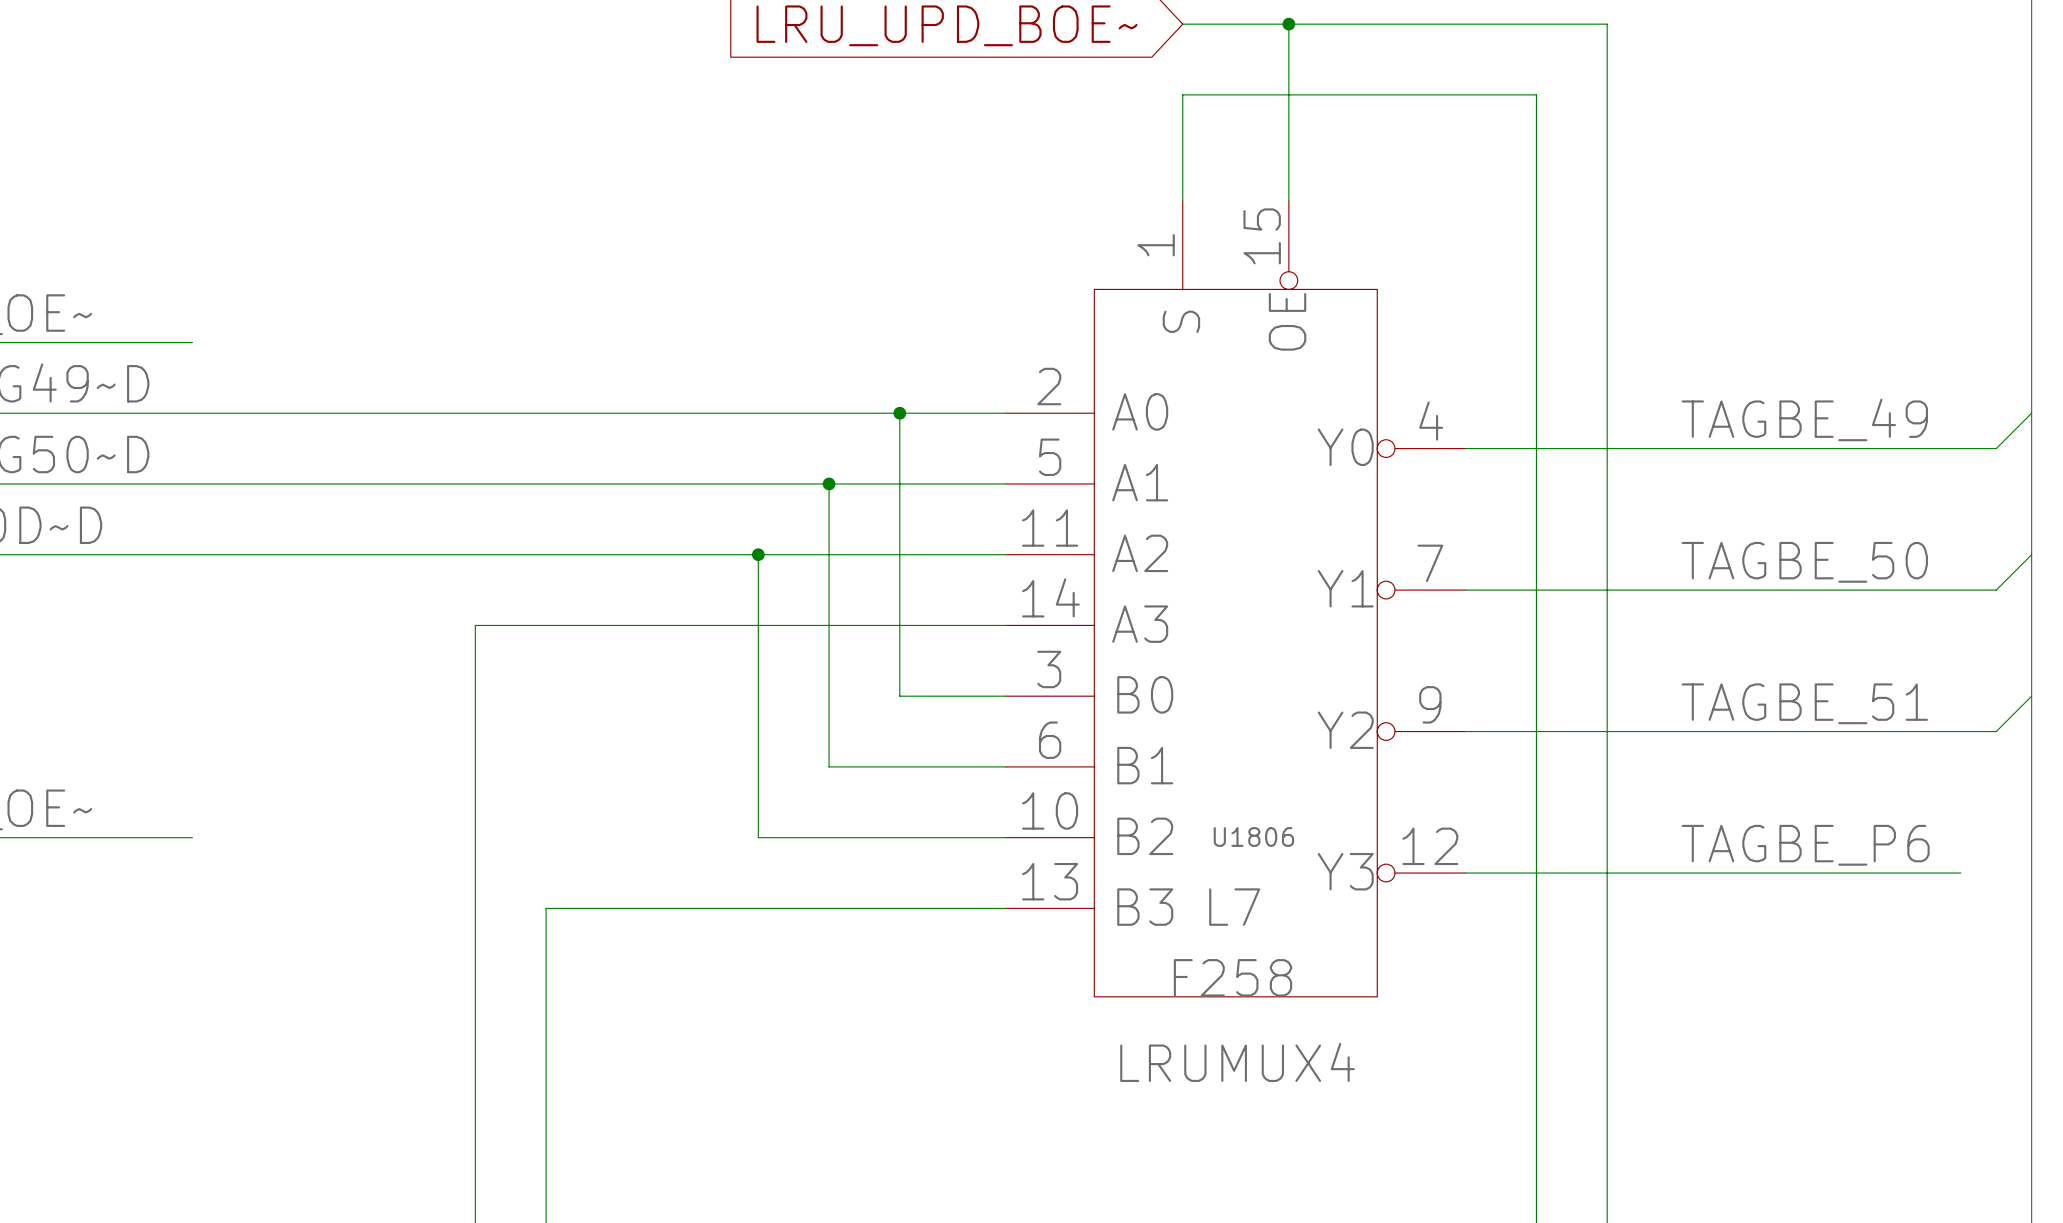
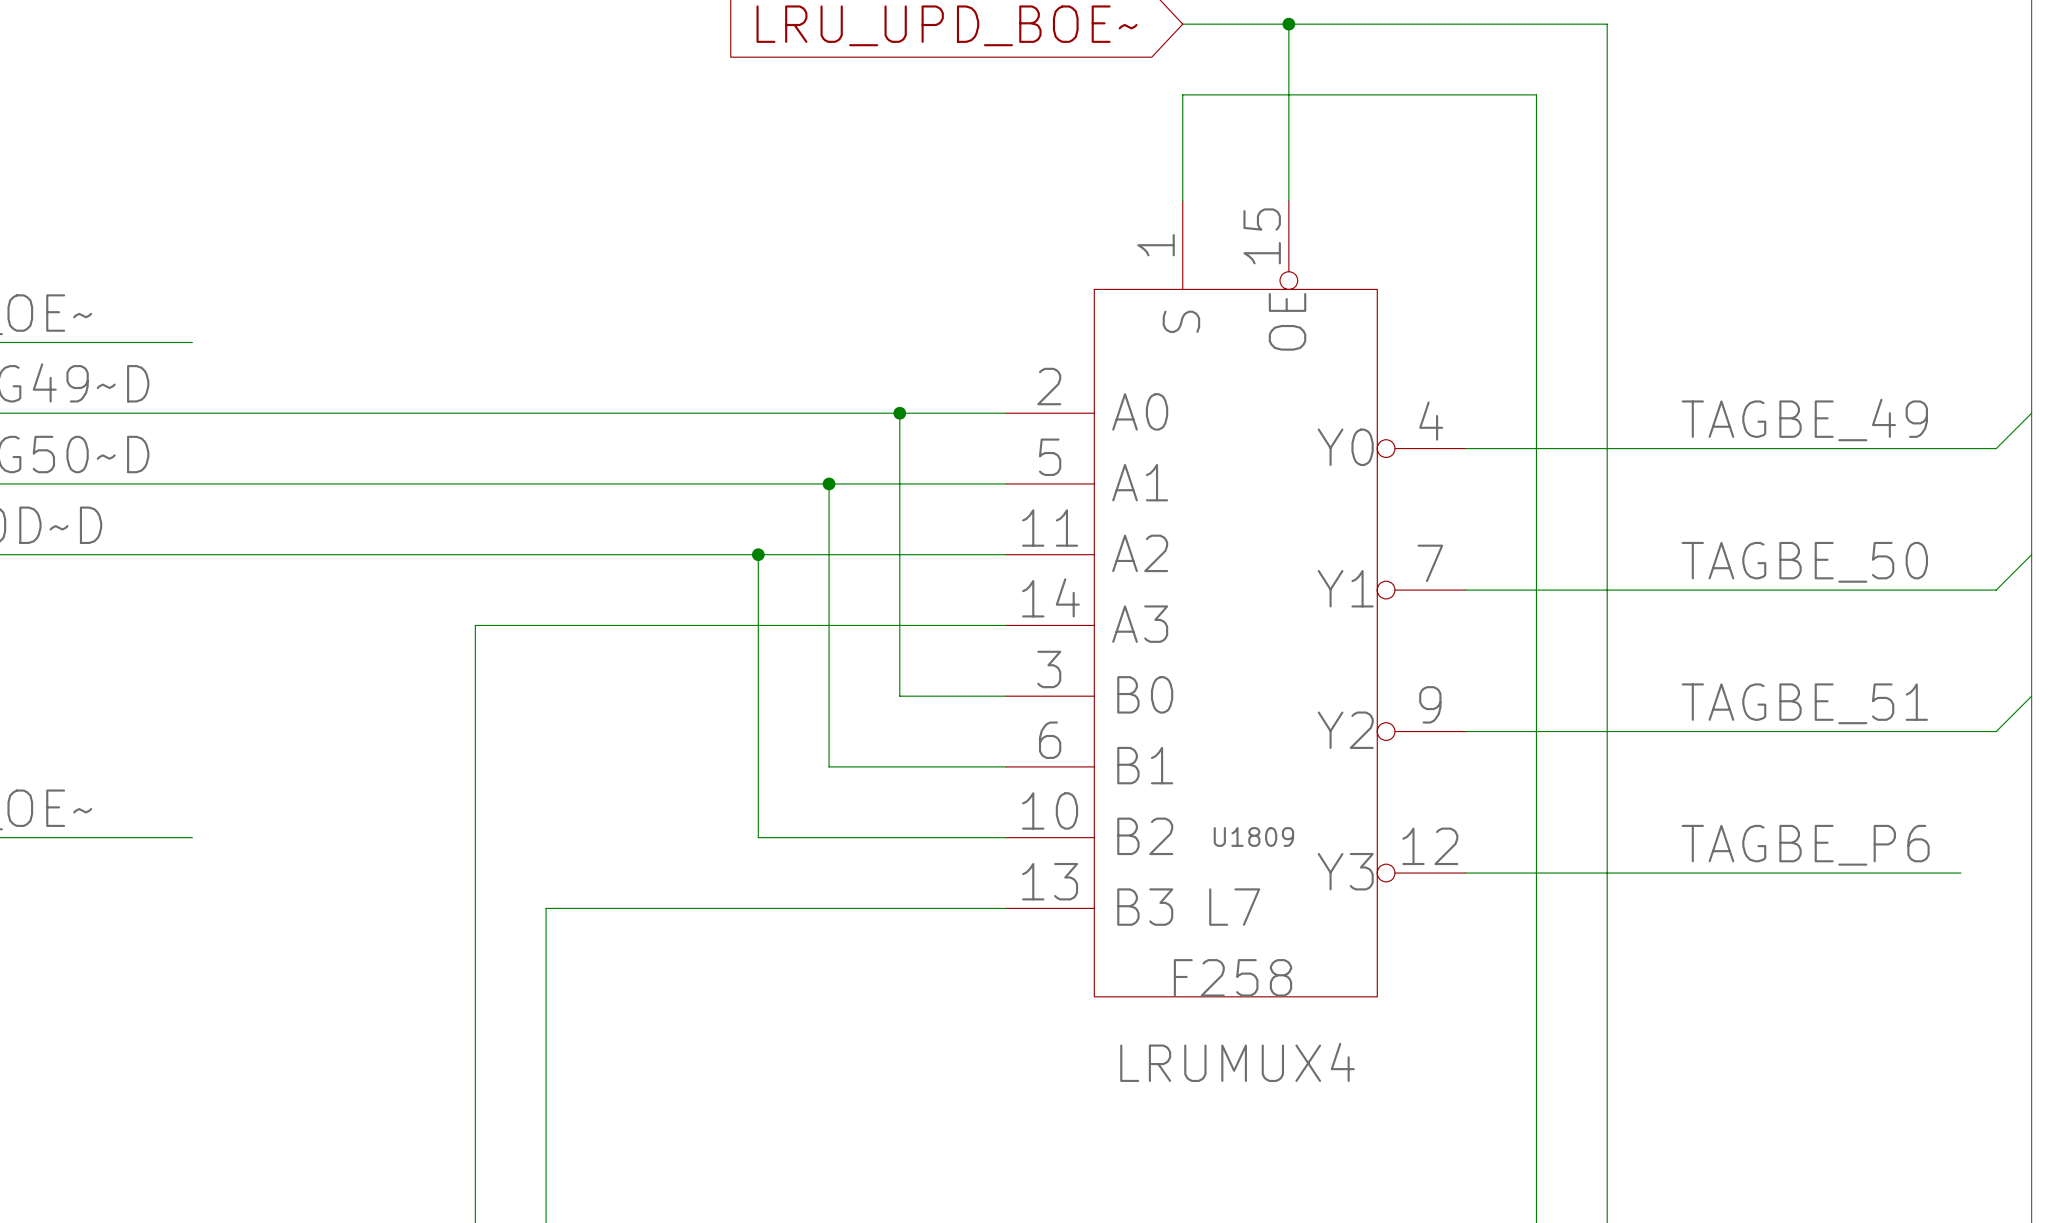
U1806 name: U1806 (1253, 837) -> U1809 (1253, 837)

